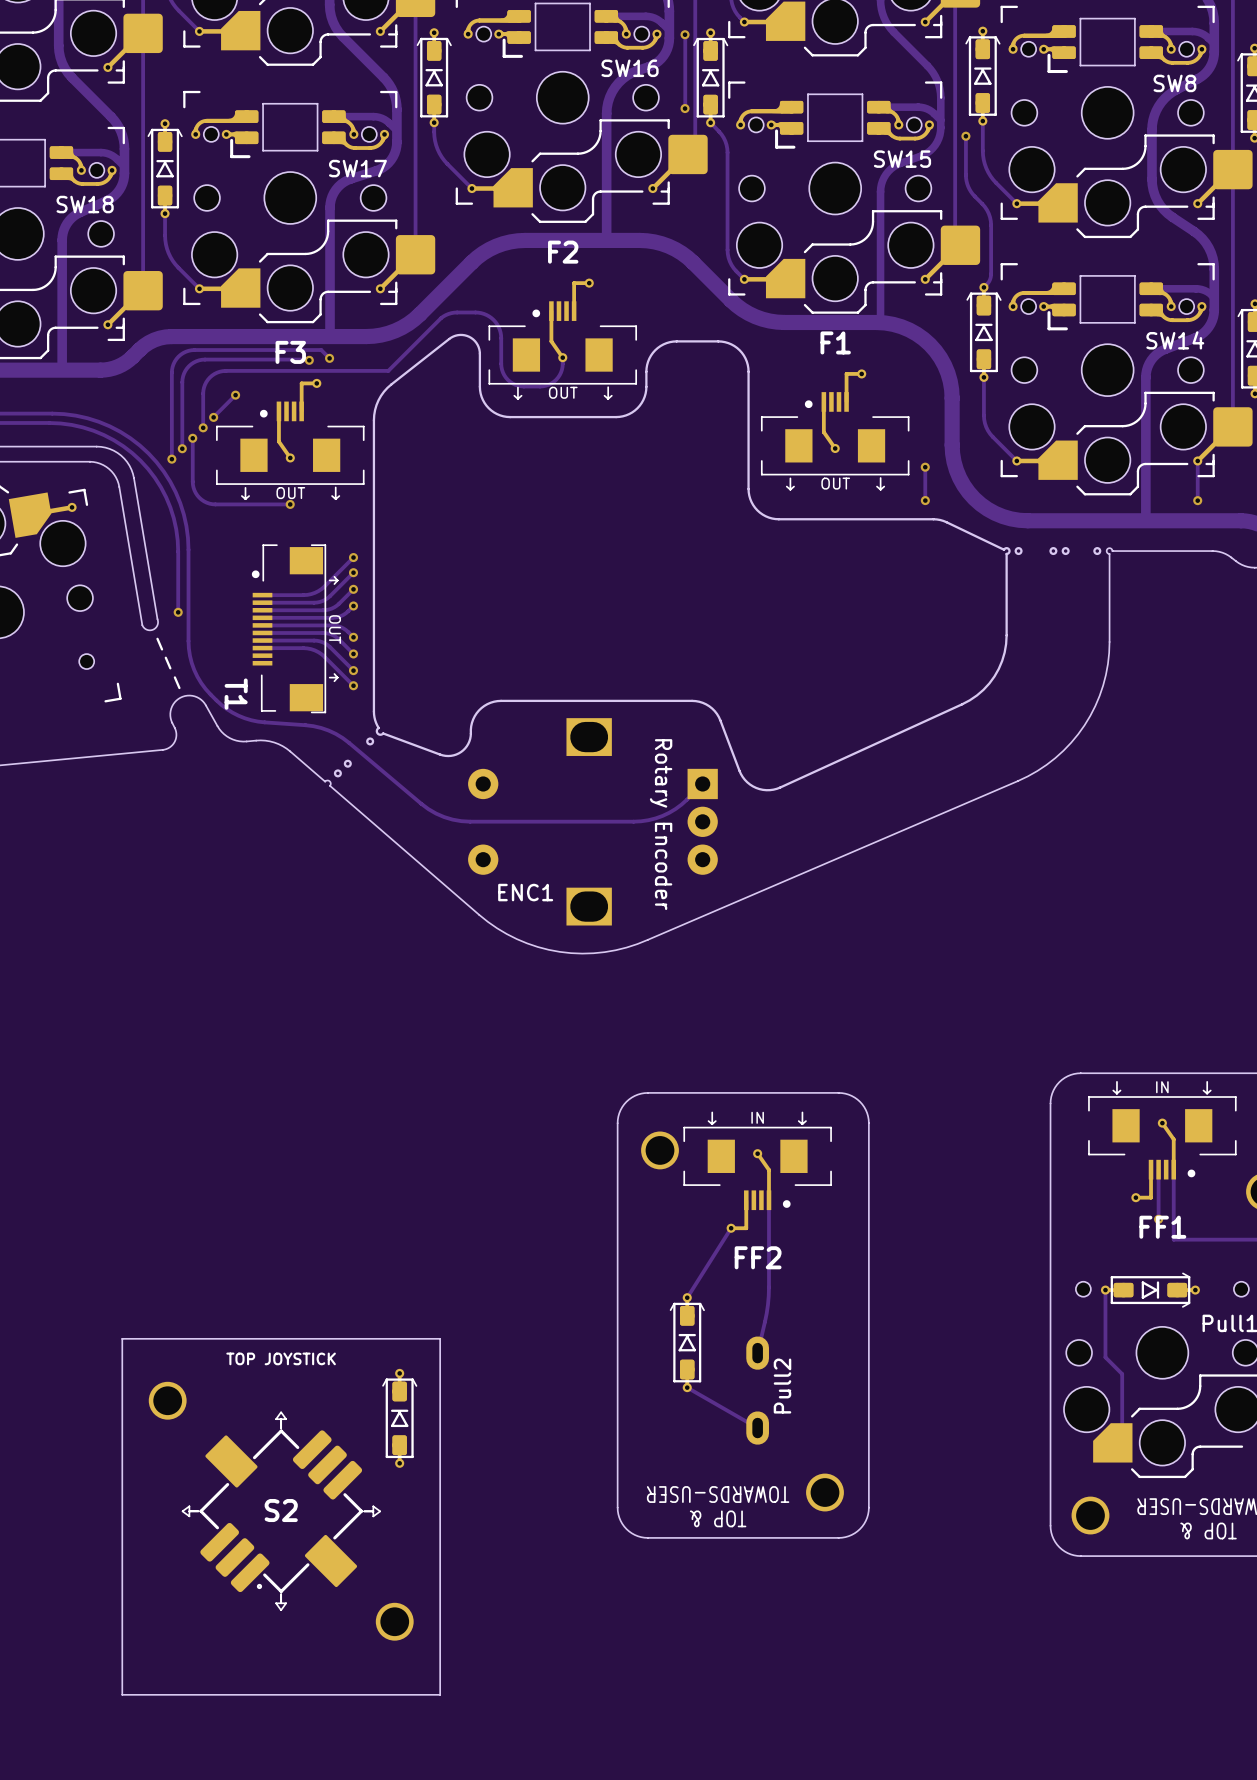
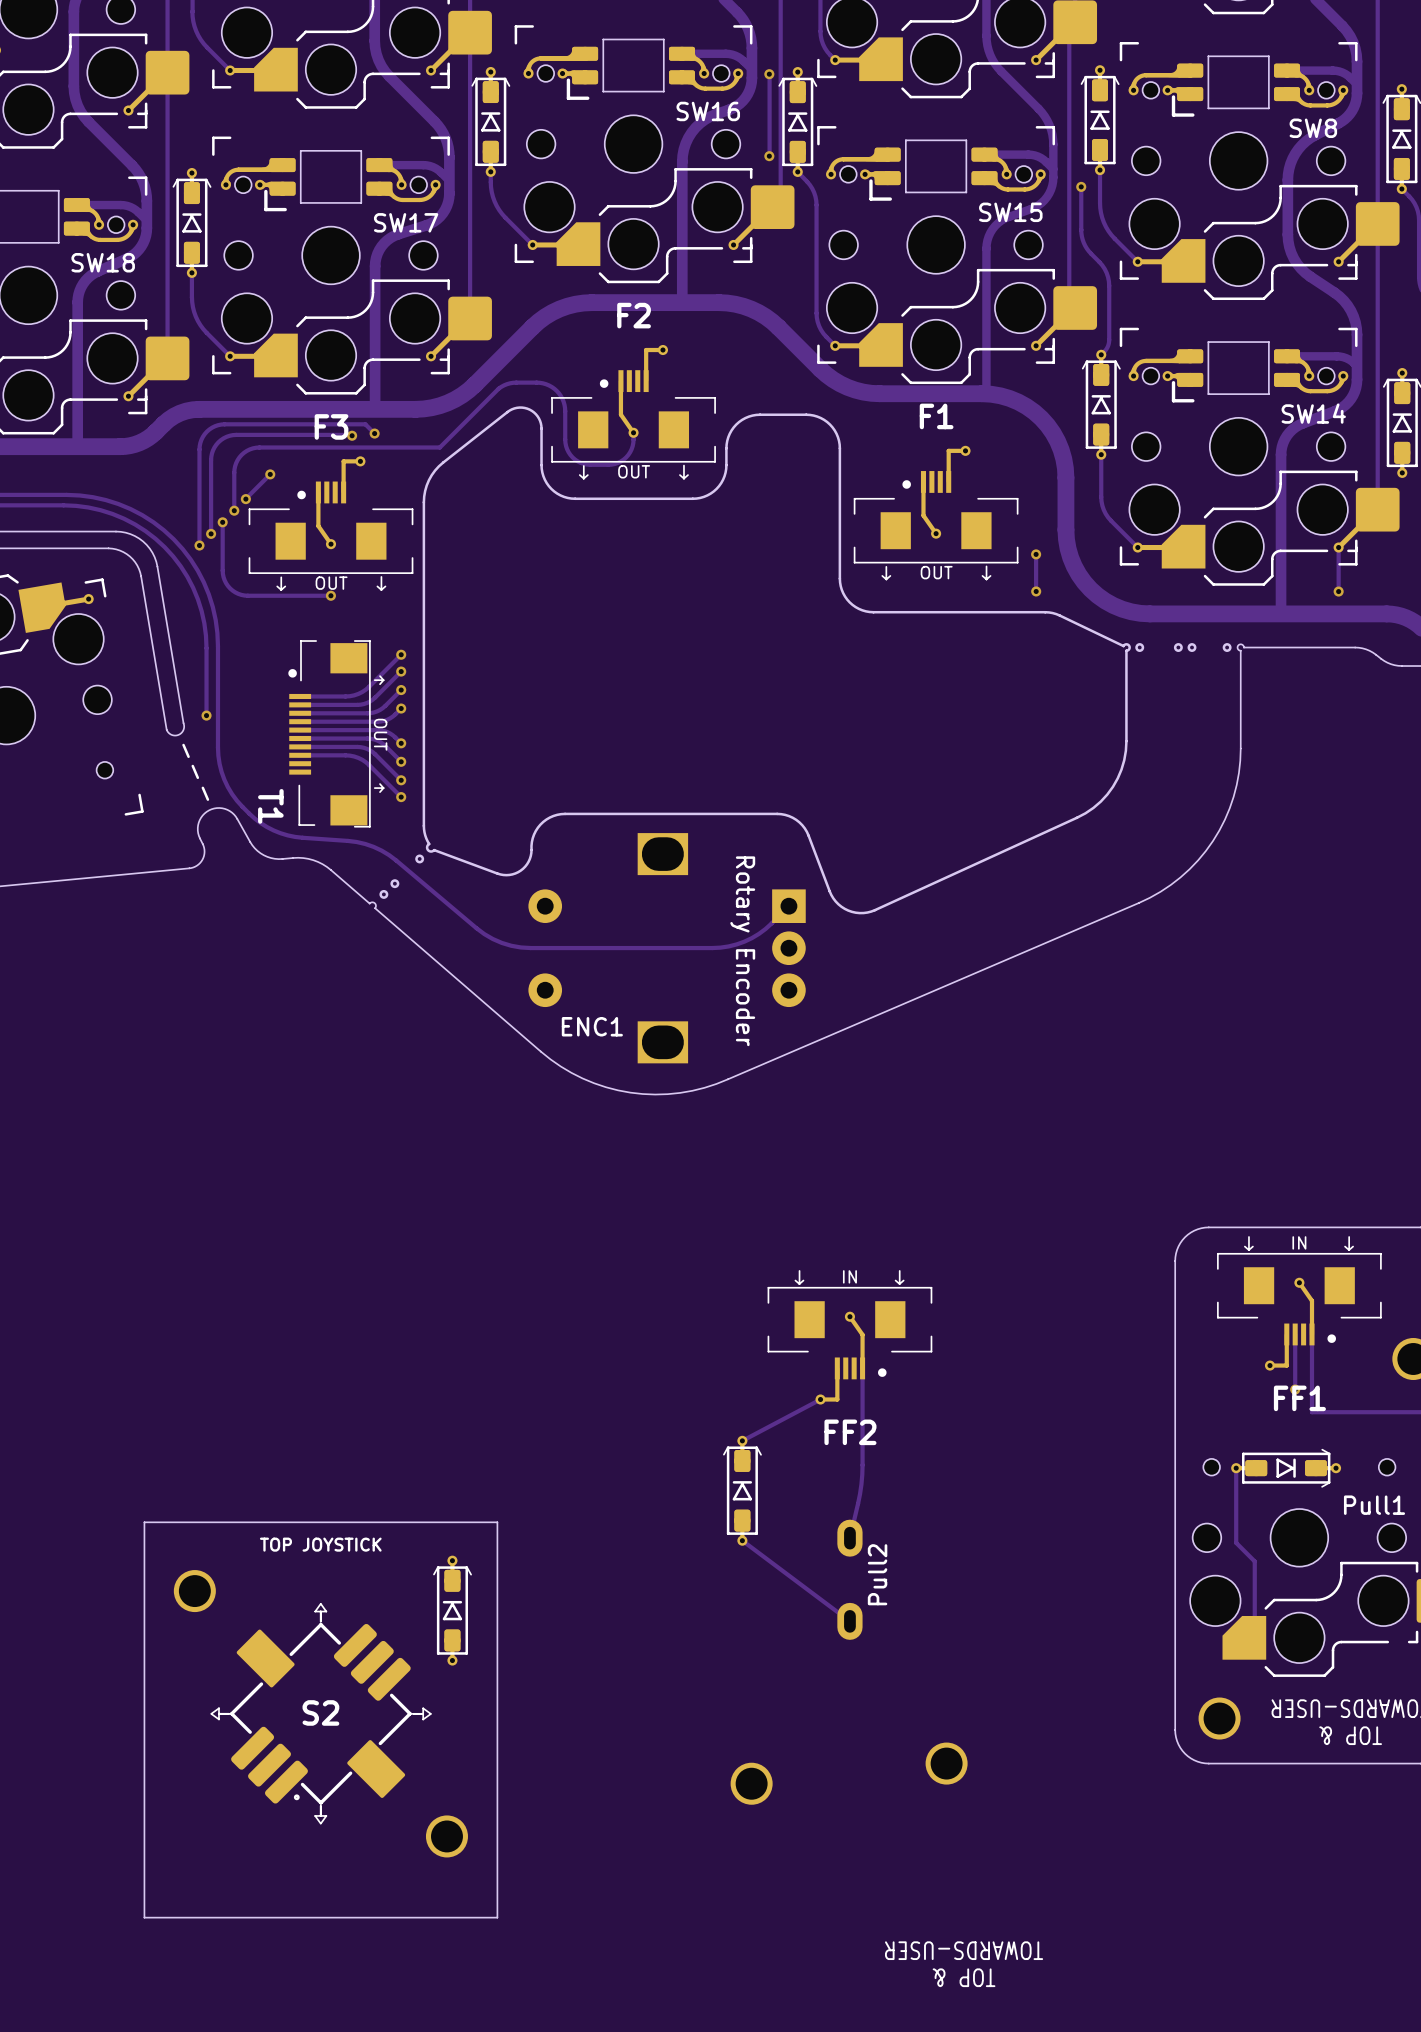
board edge: (838, 1092) (644, 1093) (631, 1097) (620, 1110) (617, 1123) (617, 1507) (622, 1523) (634, 1534) (647, 1537) (842, 1537) (857, 1531) (865, 1520) (868, 1507) (868, 1119) (865, 1110) (857, 1099) (848, 1094) (838, 1092) -> none
part: (660, 1150) -> none
track: (731, 1228) (687, 1297) -> (820, 1399) (742, 1440)
part position: (687, 1342) -> (742, 1490)
track: (687, 1387) (757, 1428) -> (742, 1540) (849, 1621)
part position: (824, 1492) -> (946, 1763)
text position: TOWARDS-USER (718, 1494) -> TOWARDS-USER (964, 1950)
text position: TOP & (718, 1518) -> TOP & (964, 1977)
part: none -> (751, 1783)

